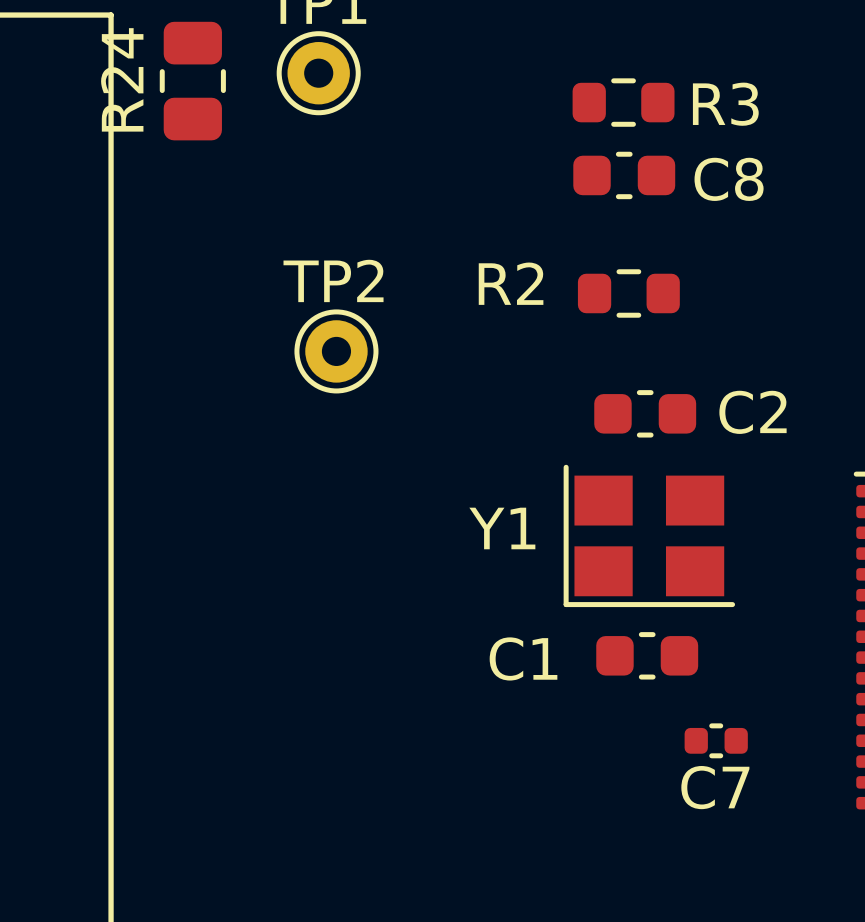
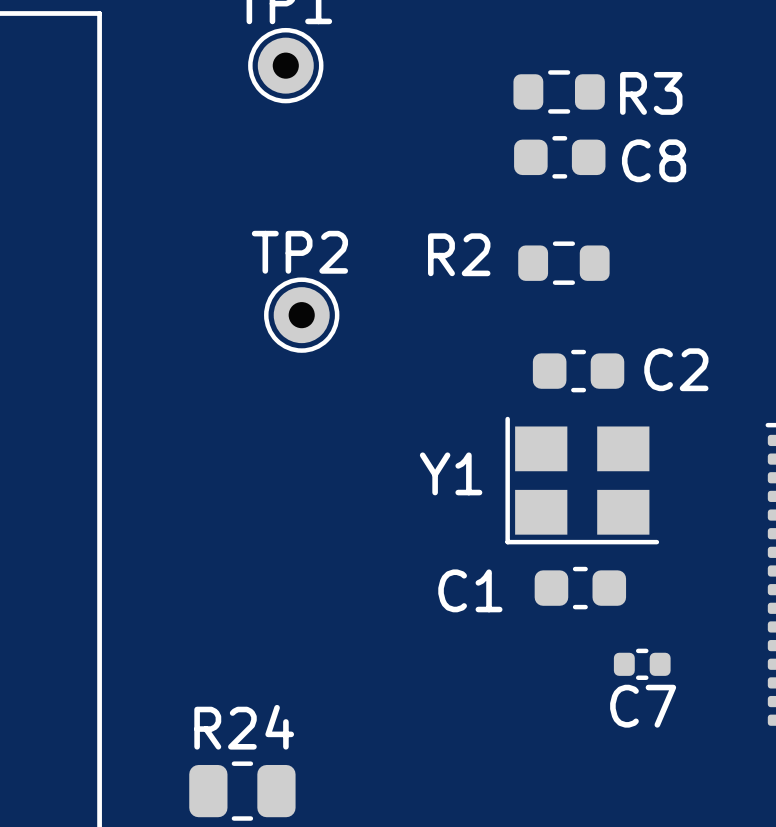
R24 rotation: 0° (192, 81) -> 90° clockwise (242, 791)
R24 position: (192, 81) -> (242, 791)

